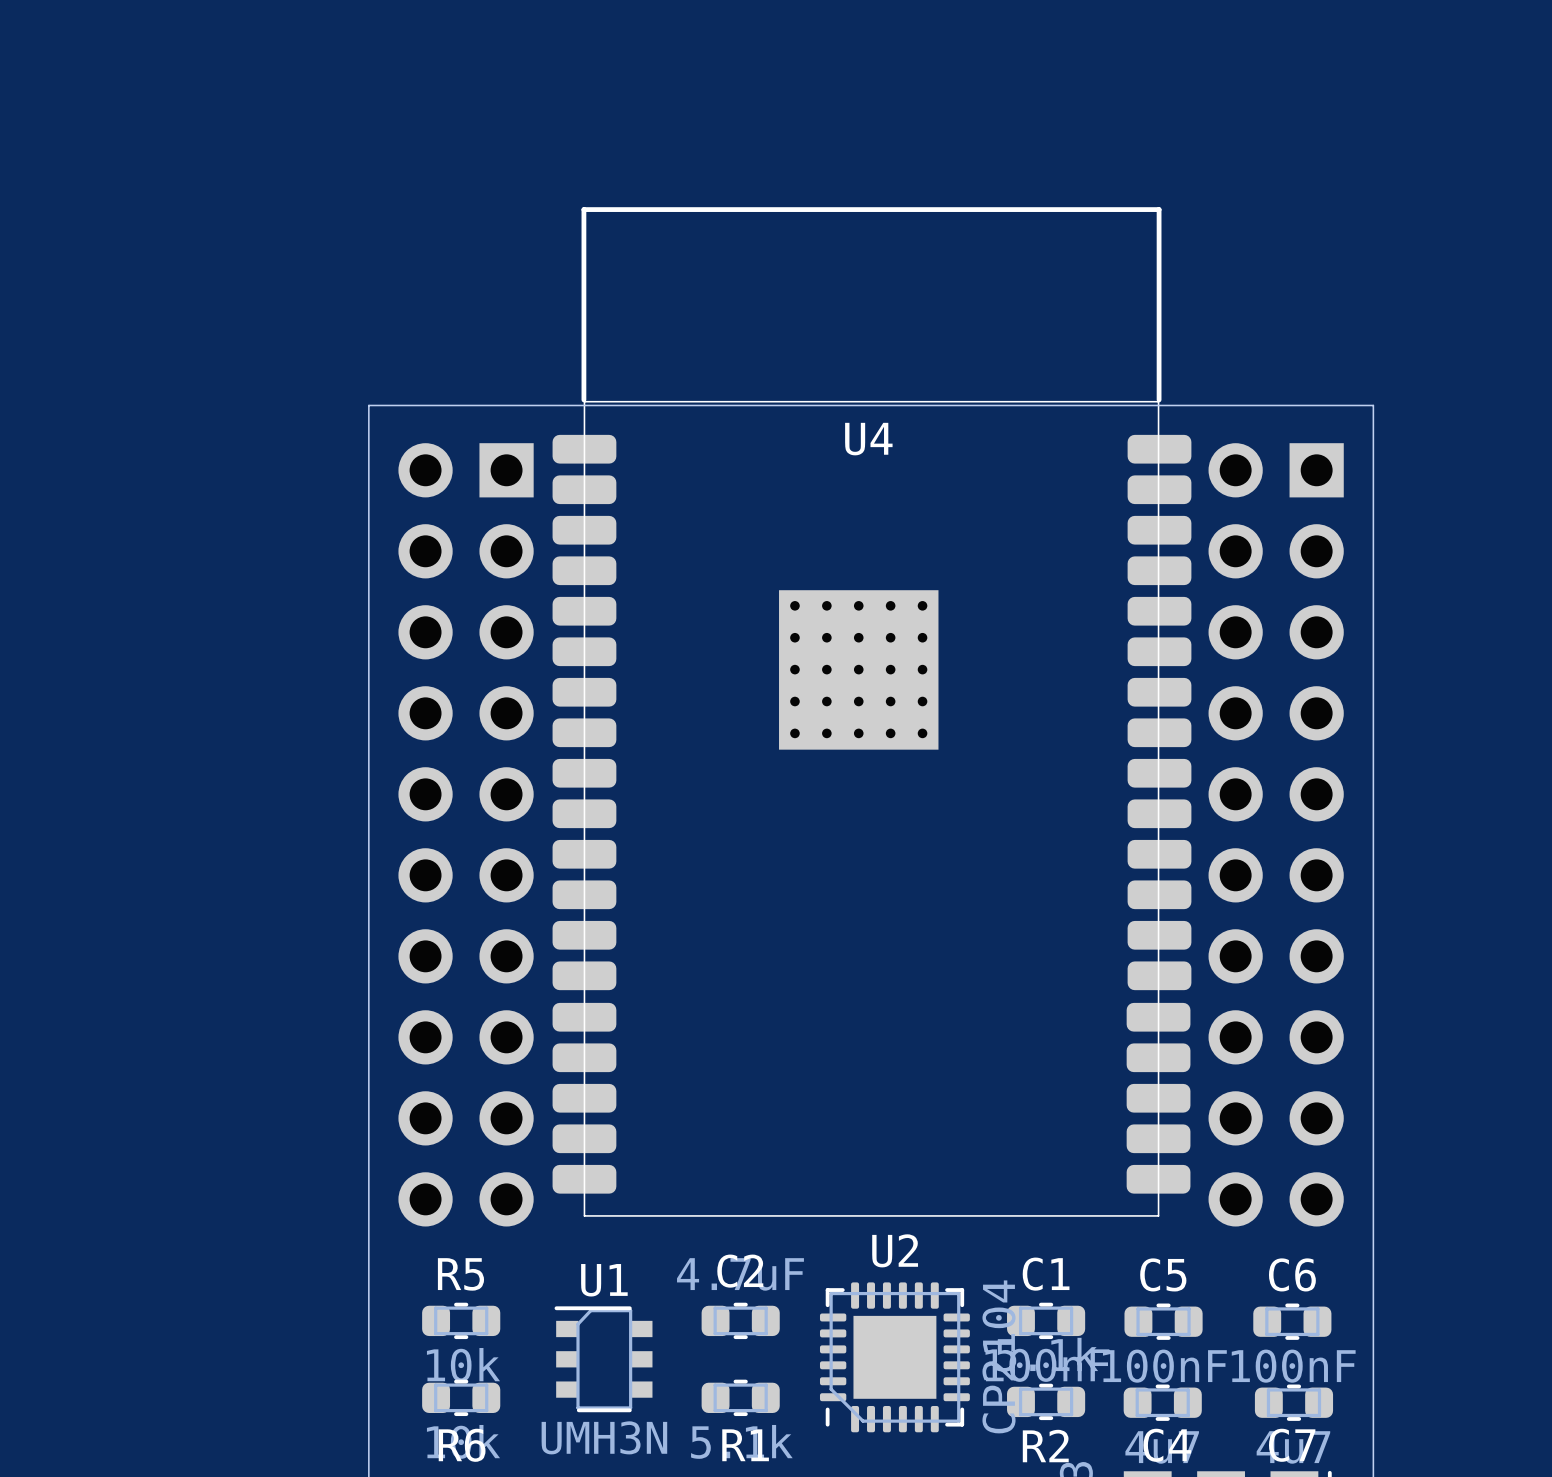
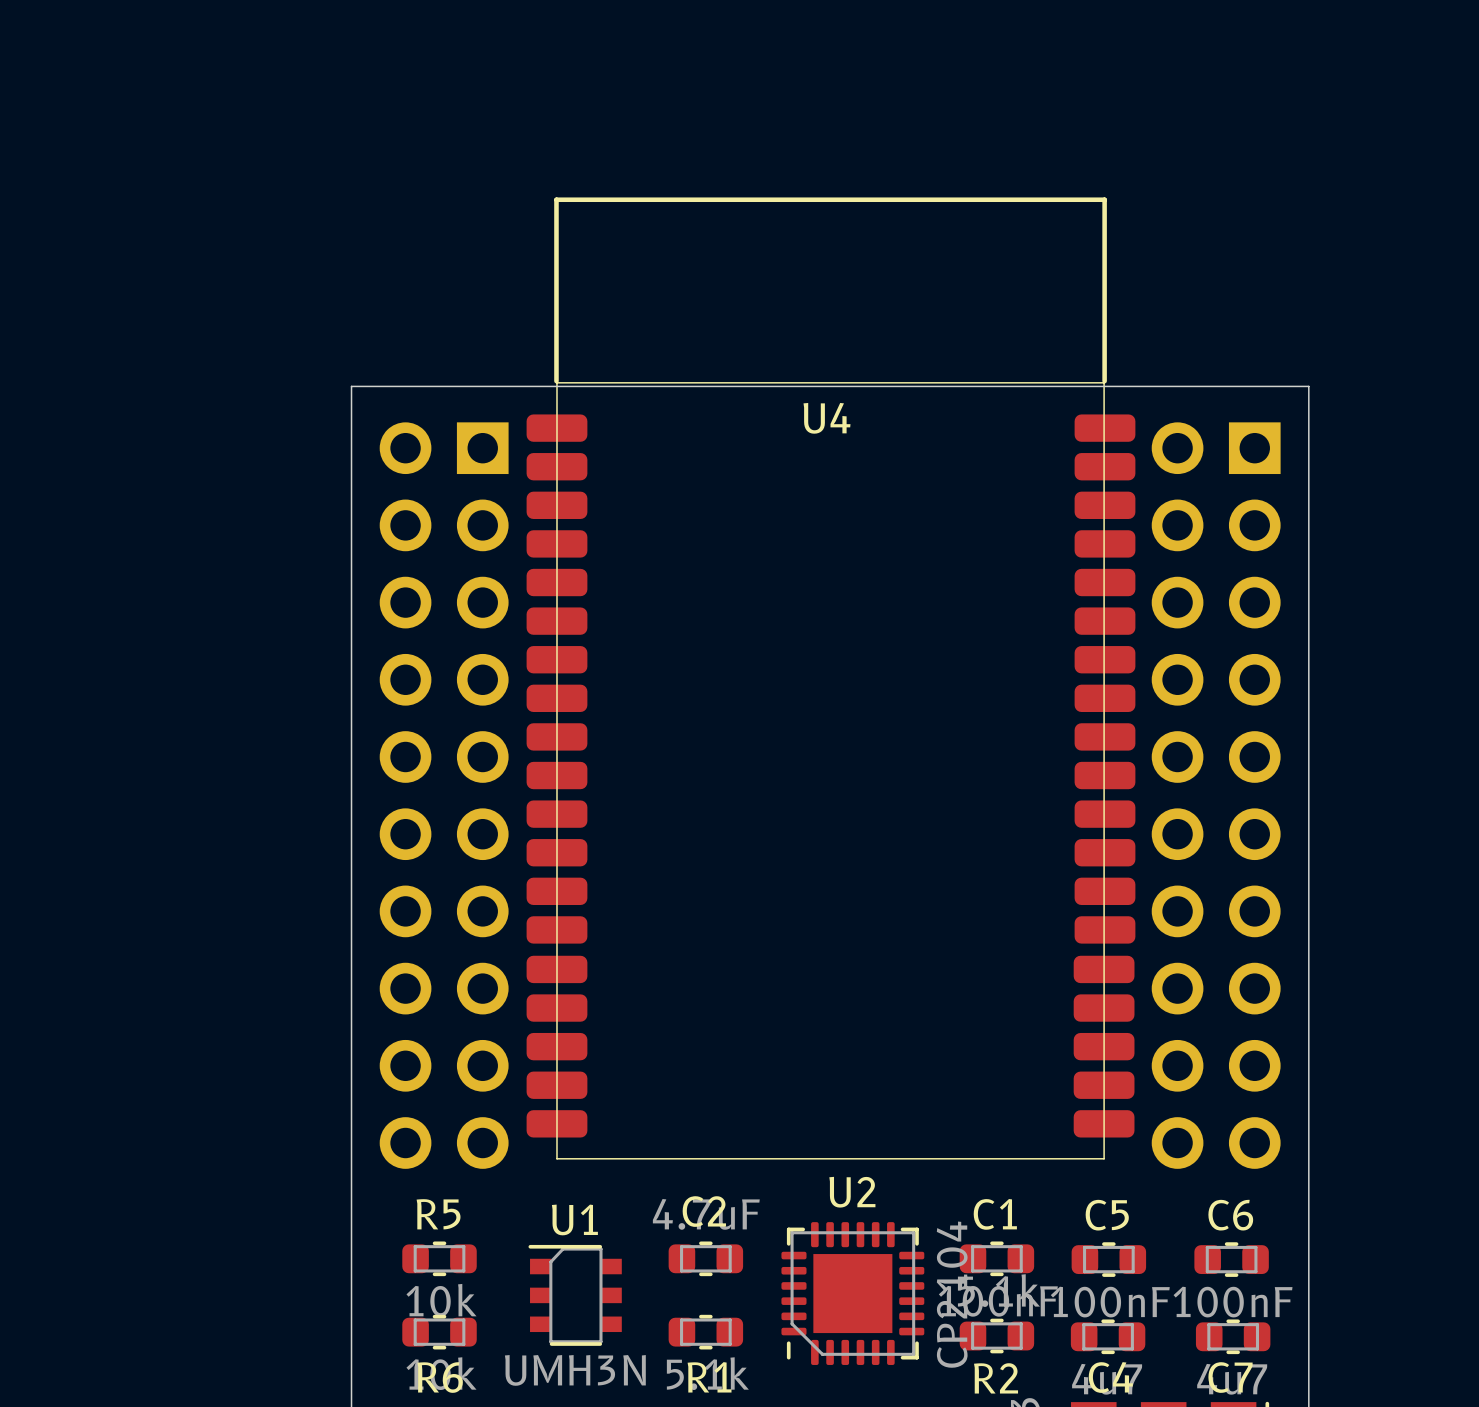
U4 footprint: [552, 207, 1192, 1217] -> [526, 197, 1136, 1160]

